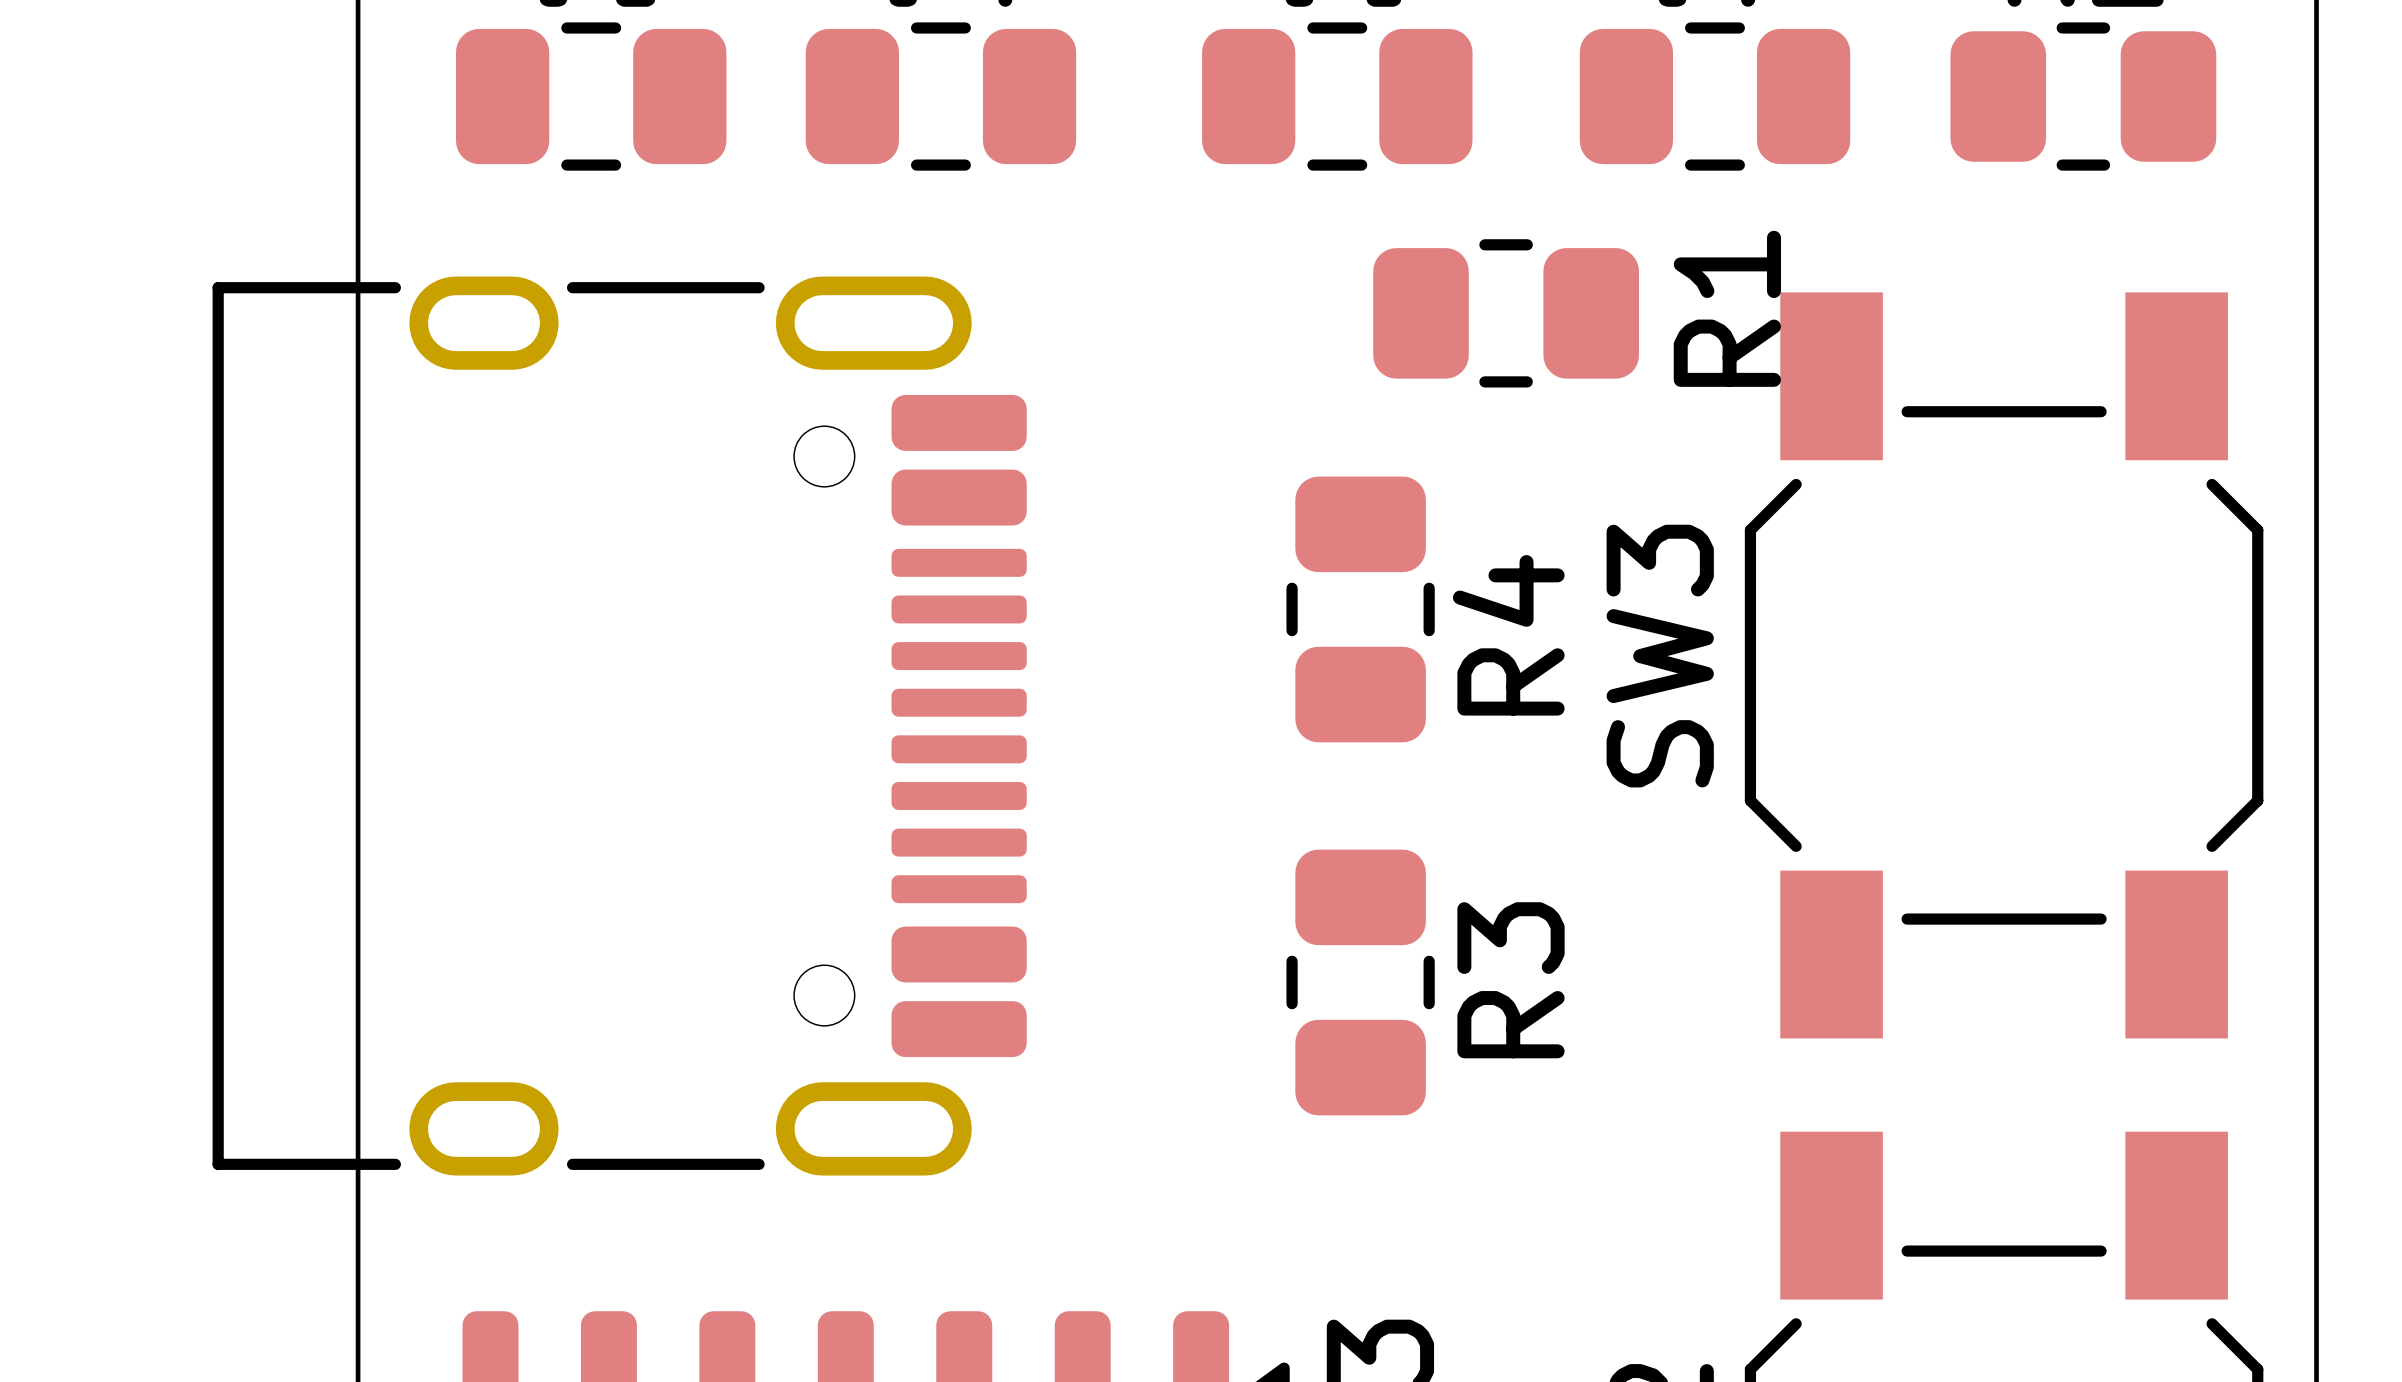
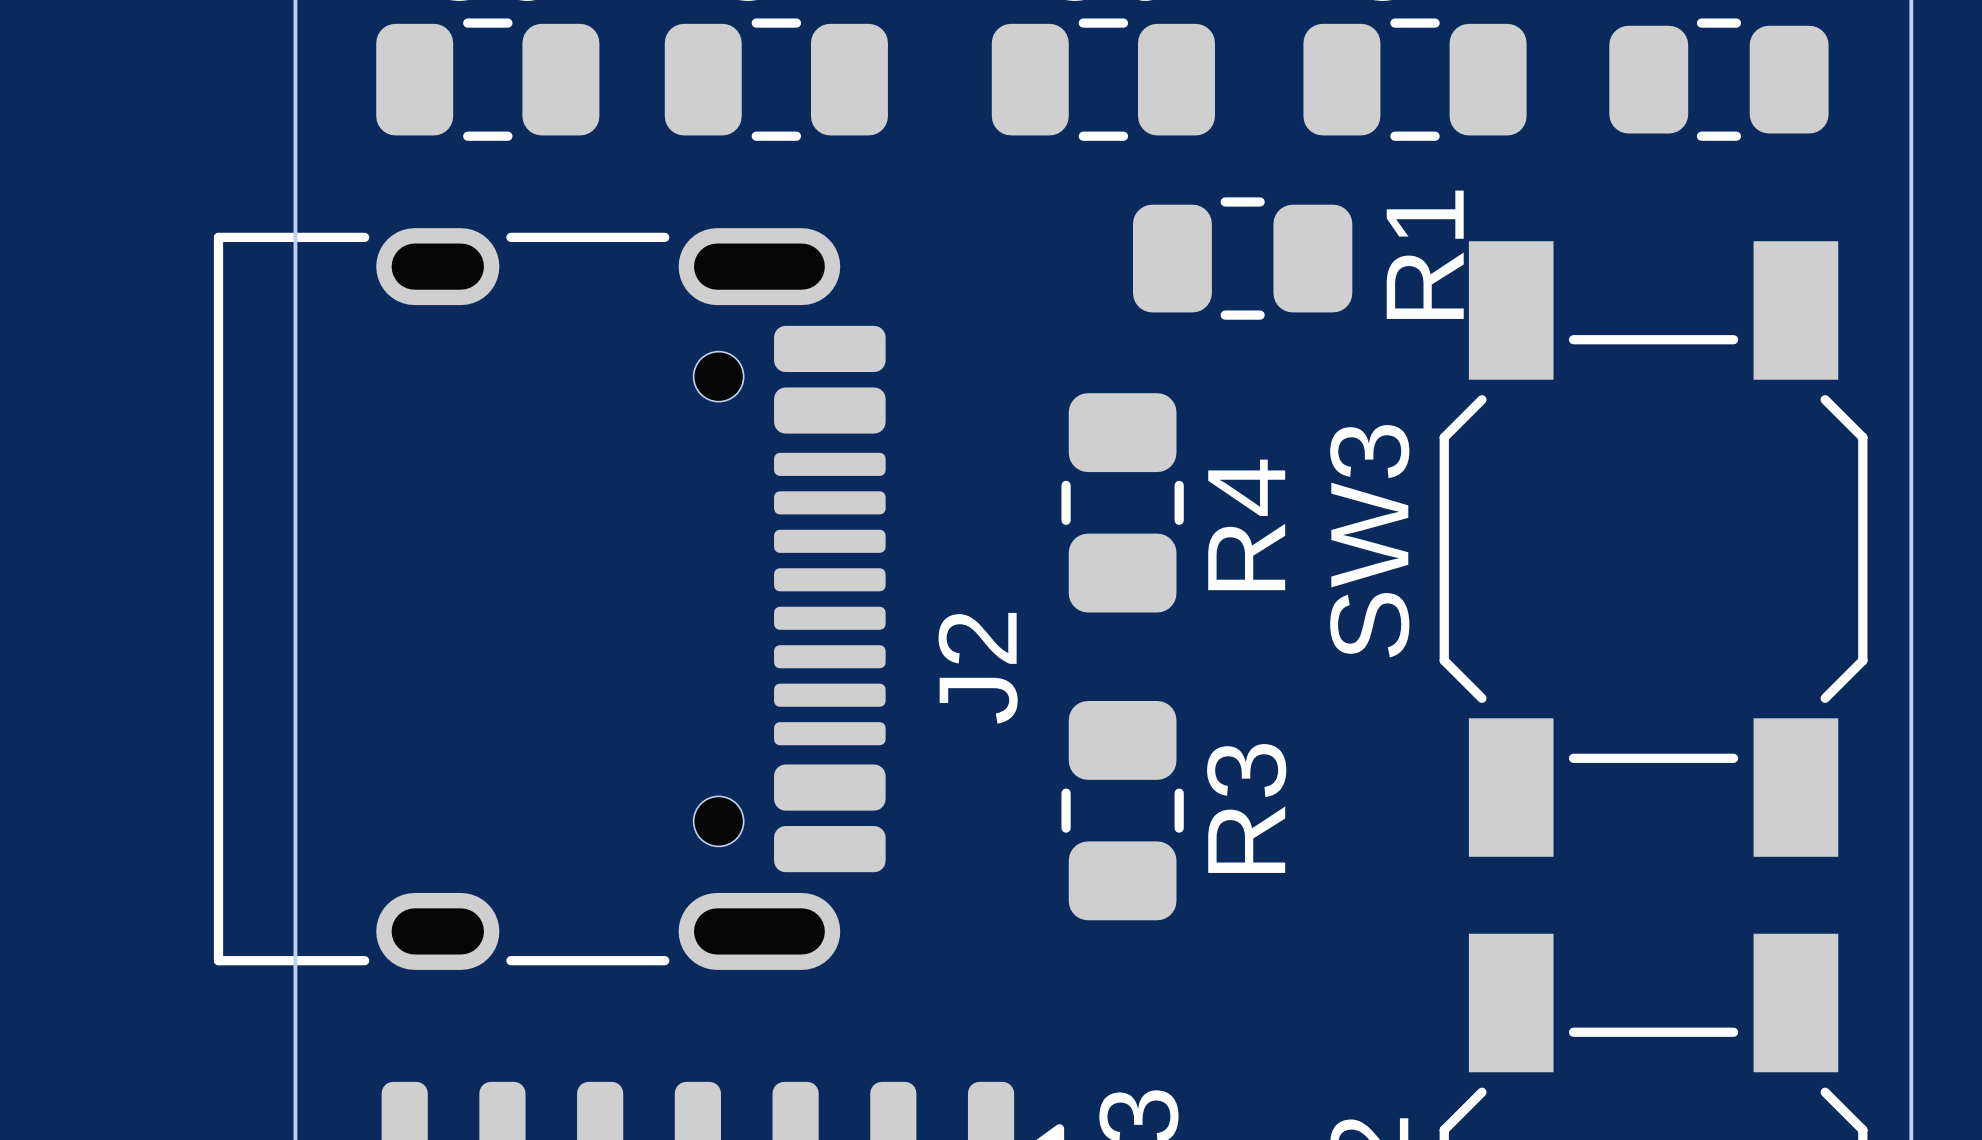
J2 position: (619, 726) -> (549, 599)
J2 name: none -> J2 (978, 668)

